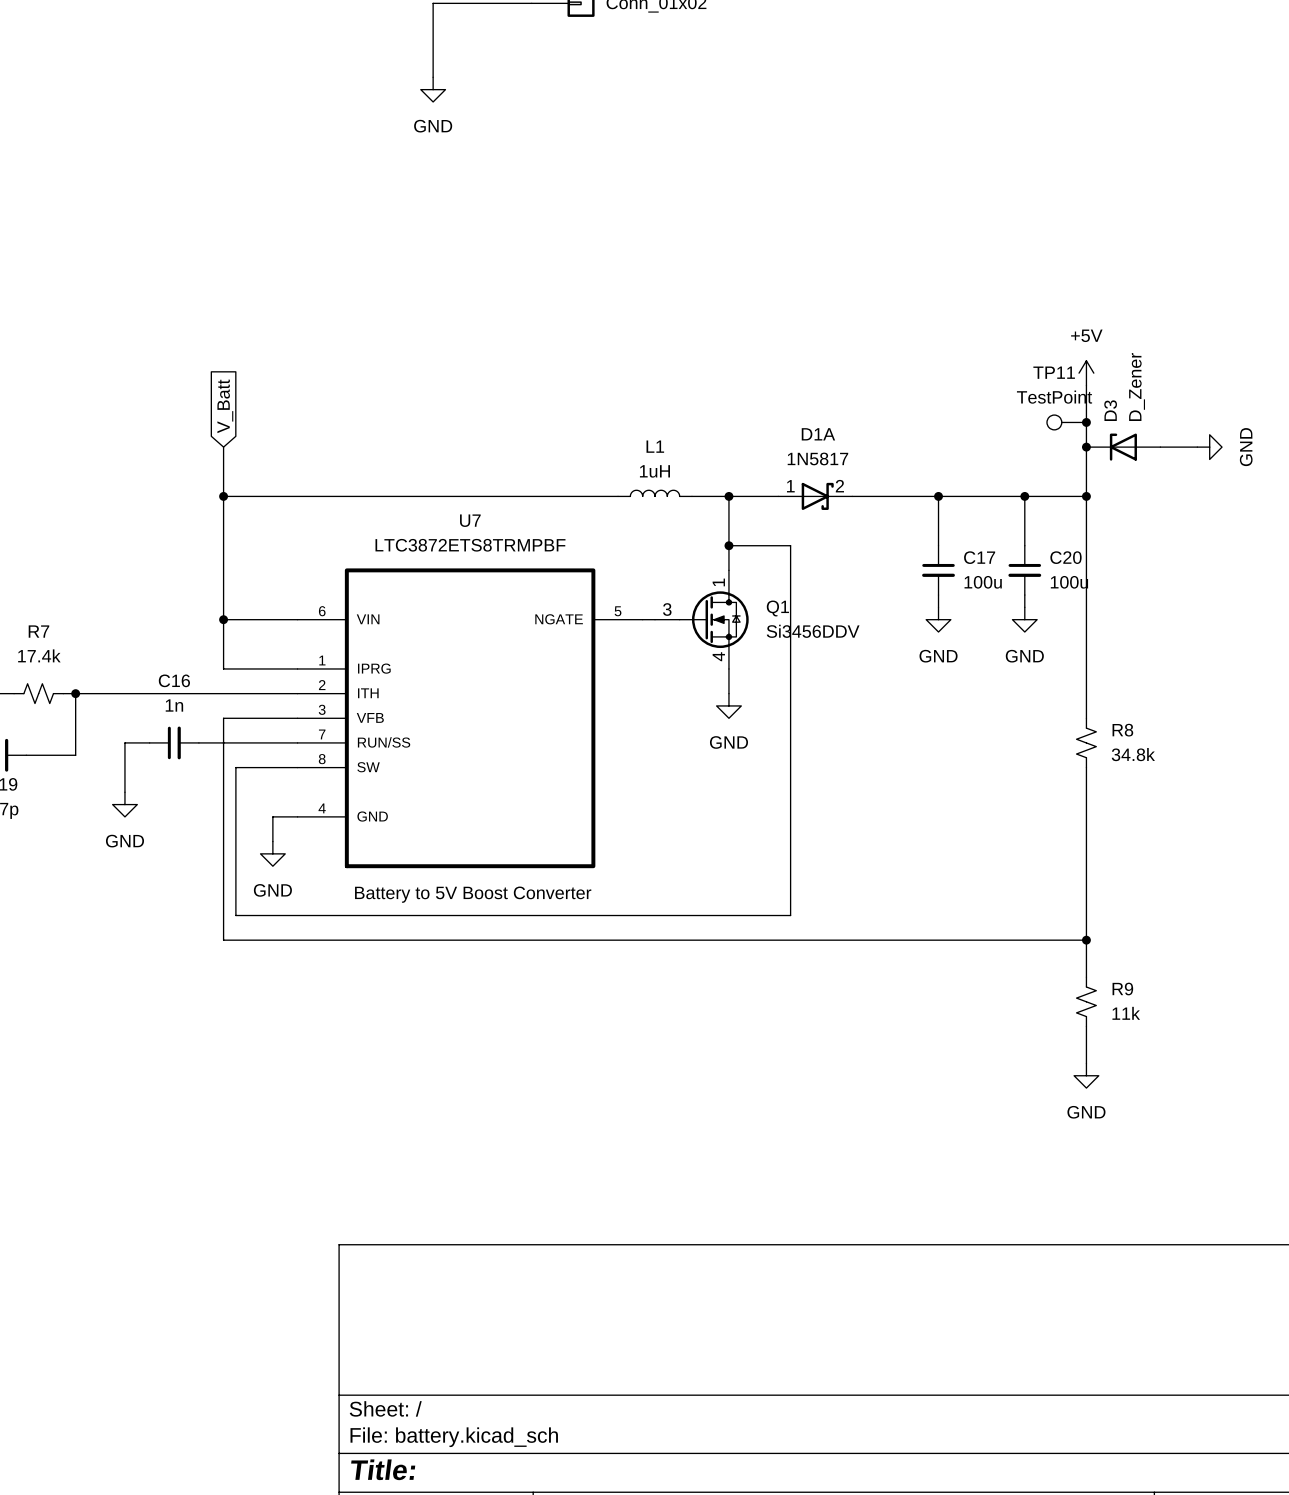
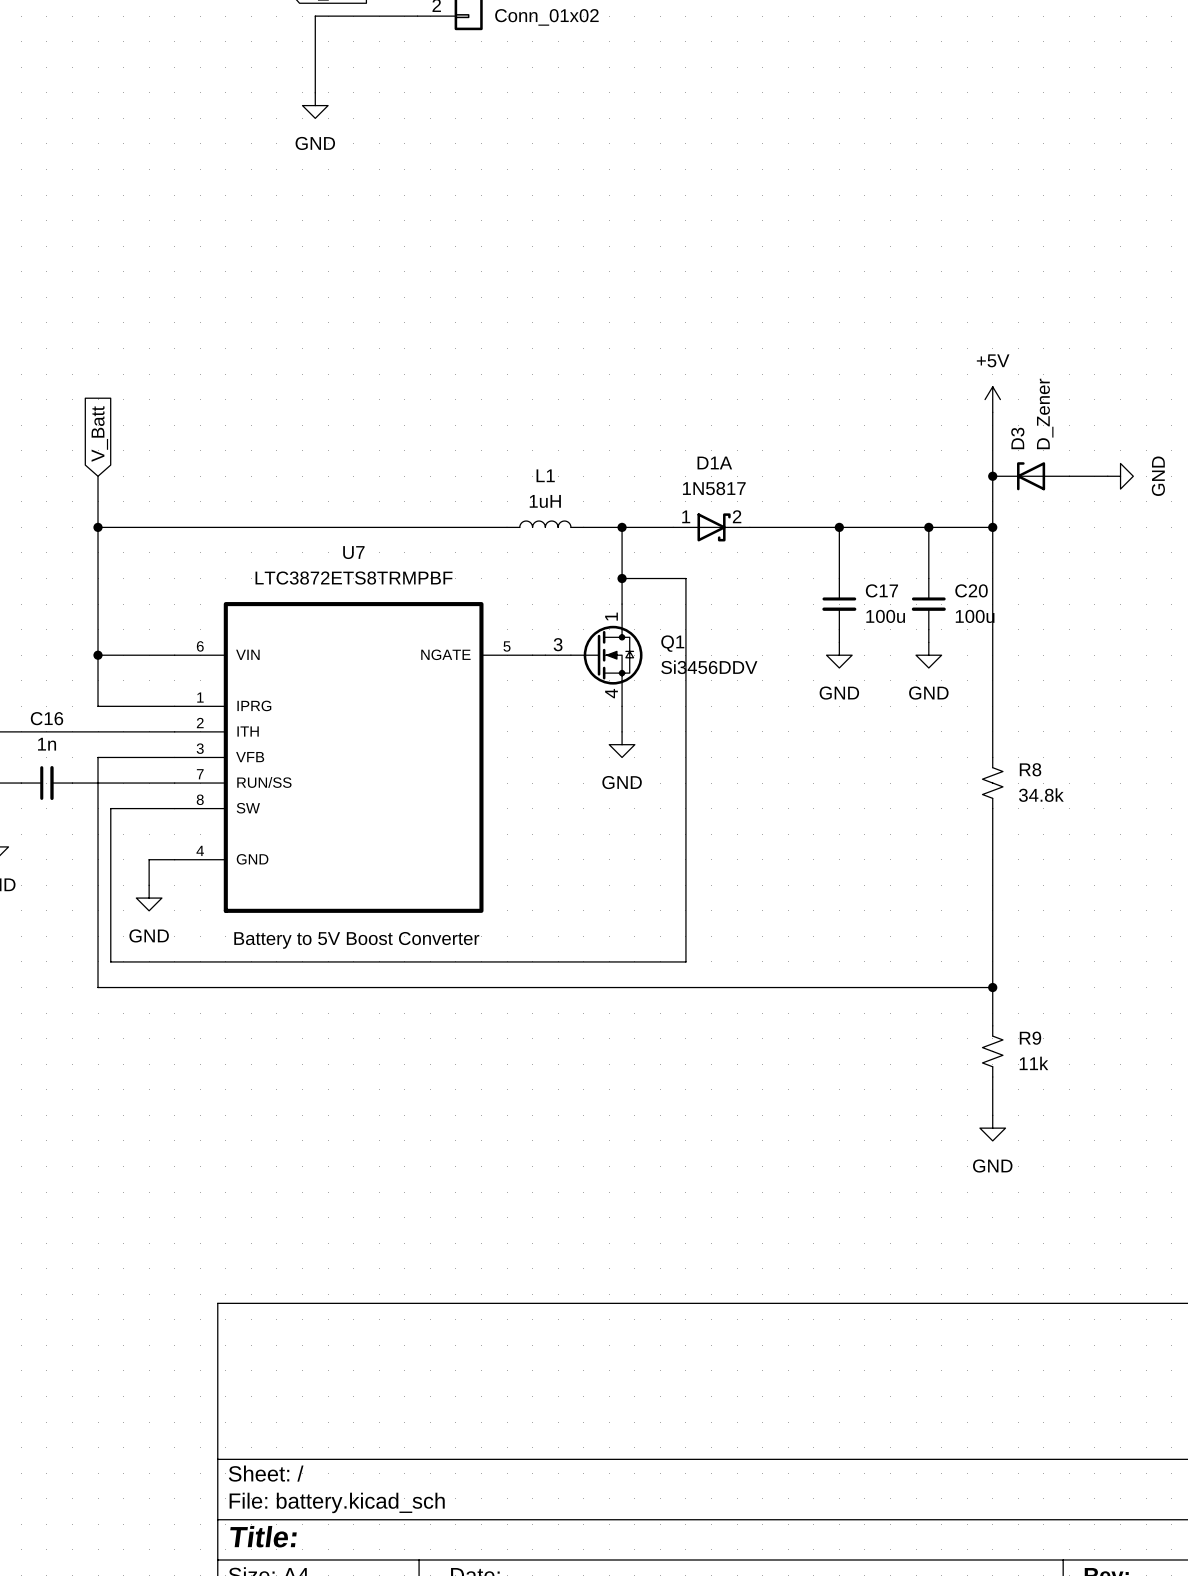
TP11: TestPoint (1066, 422) -> none
junction: (1086, 422) -> none

